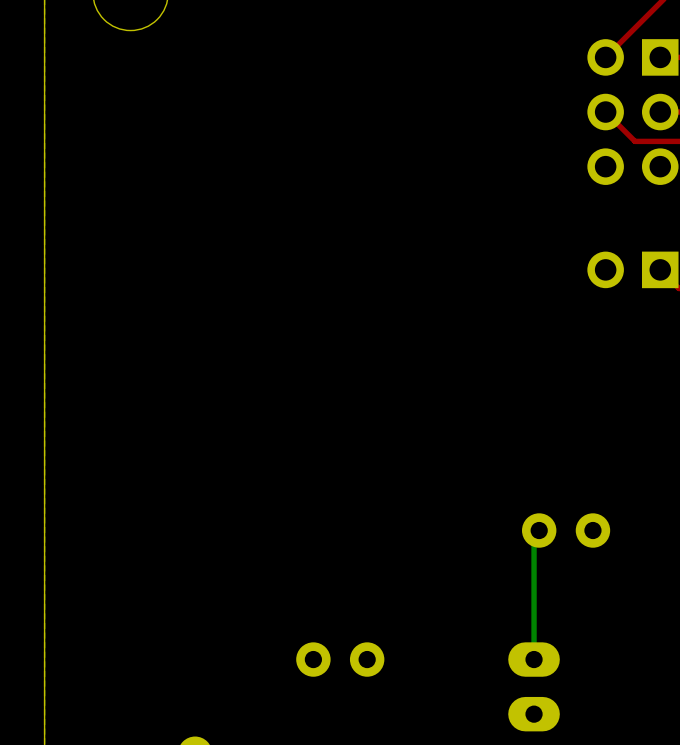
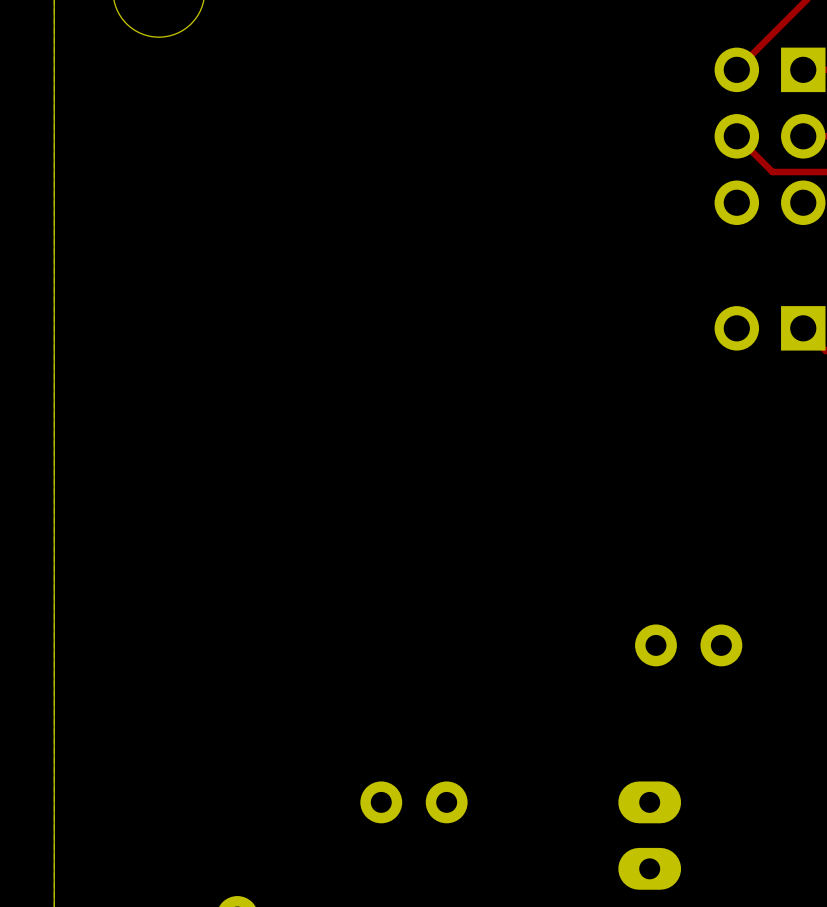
bottom track: (539, 530) (534, 535) (534, 659) -> none

